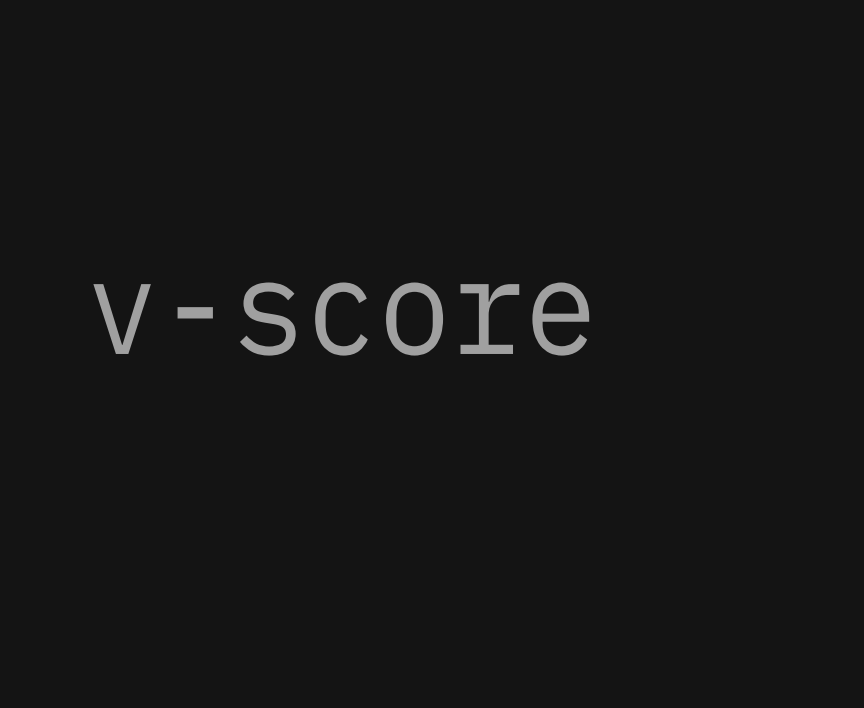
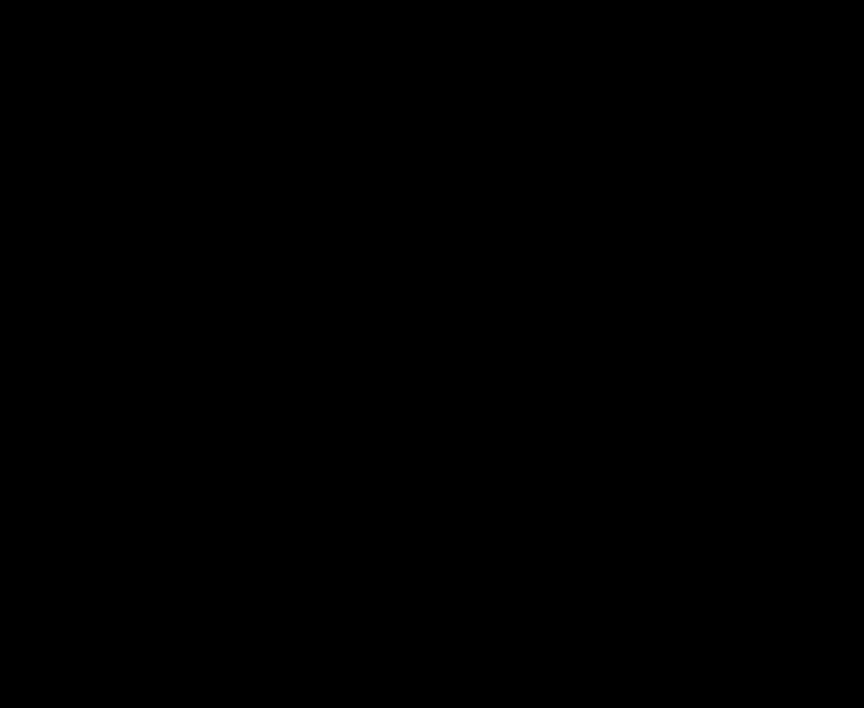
text: v-score (341, 319) -> none

